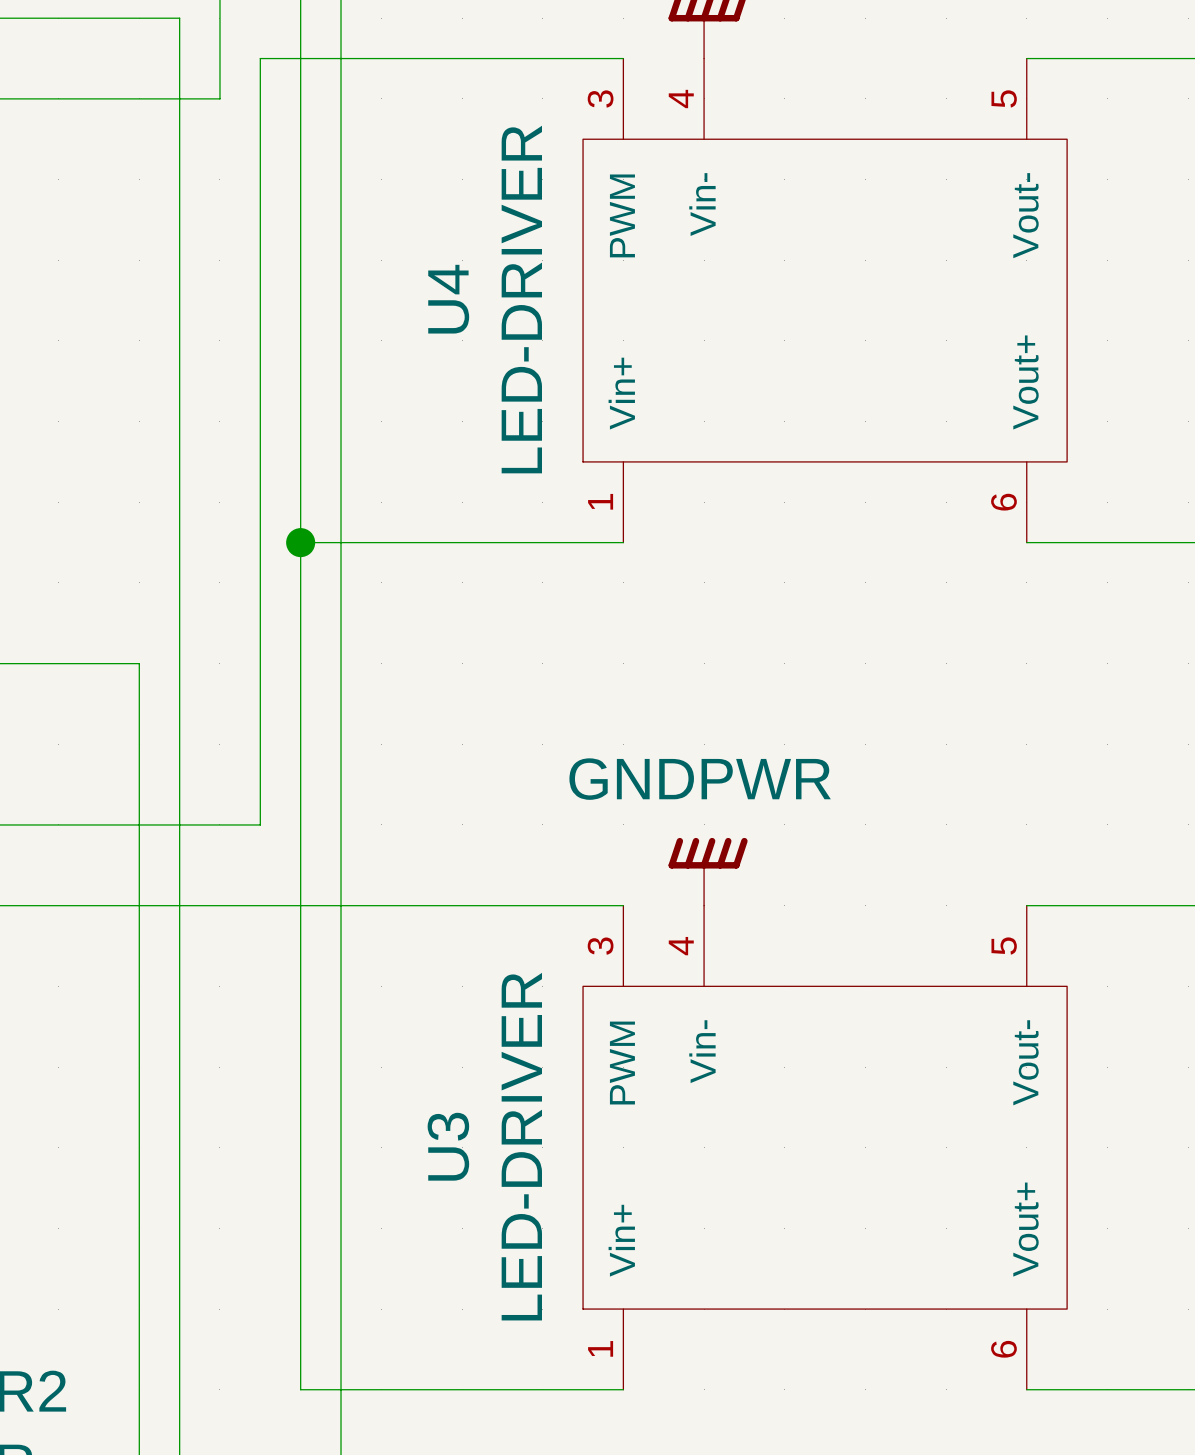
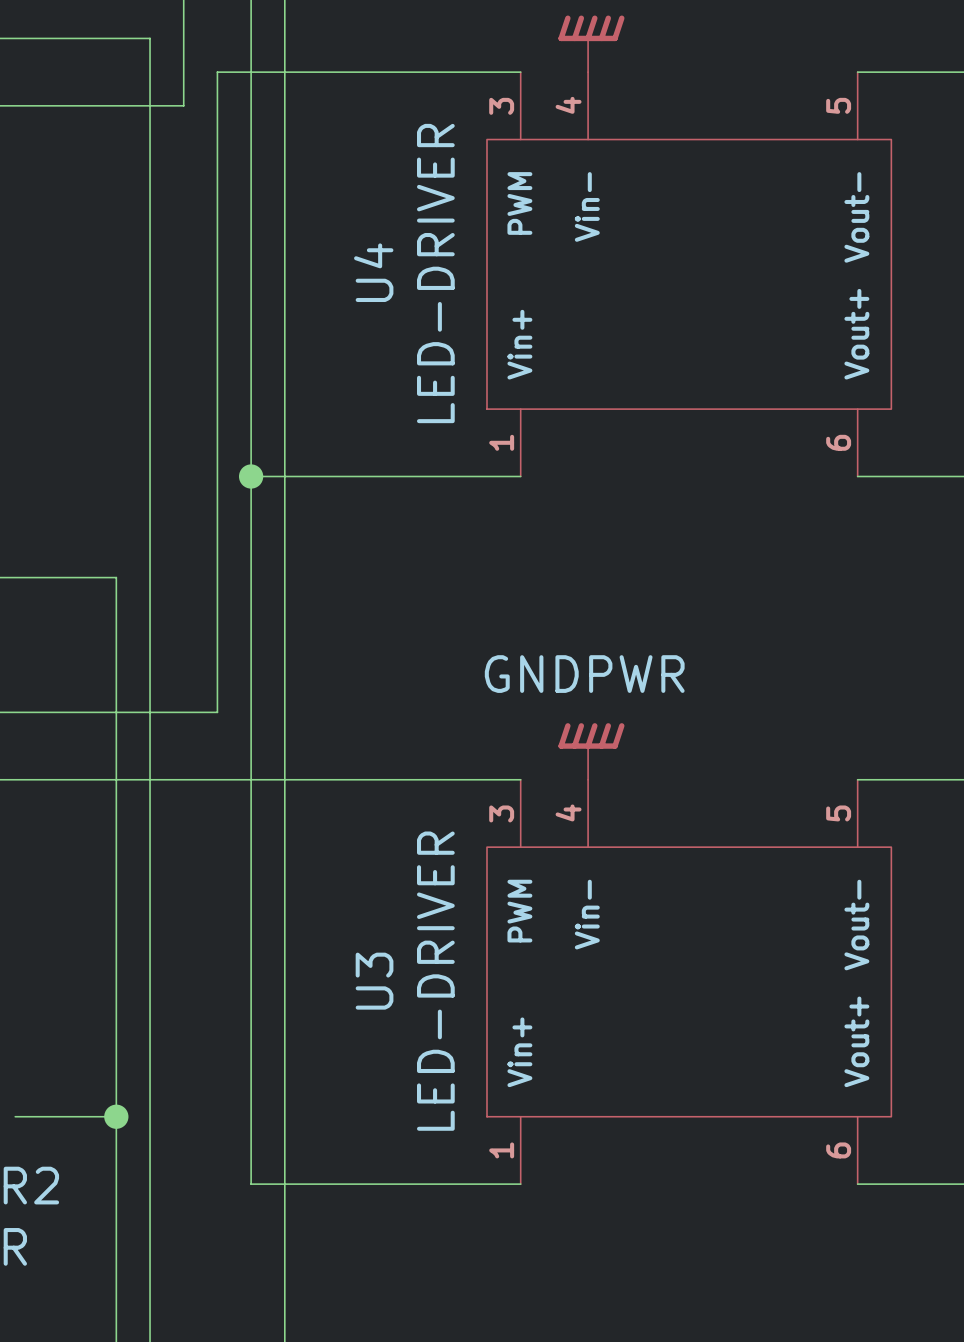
wire: none -> (15, 1116) (116, 1116)
junction: none -> (116, 1116)

